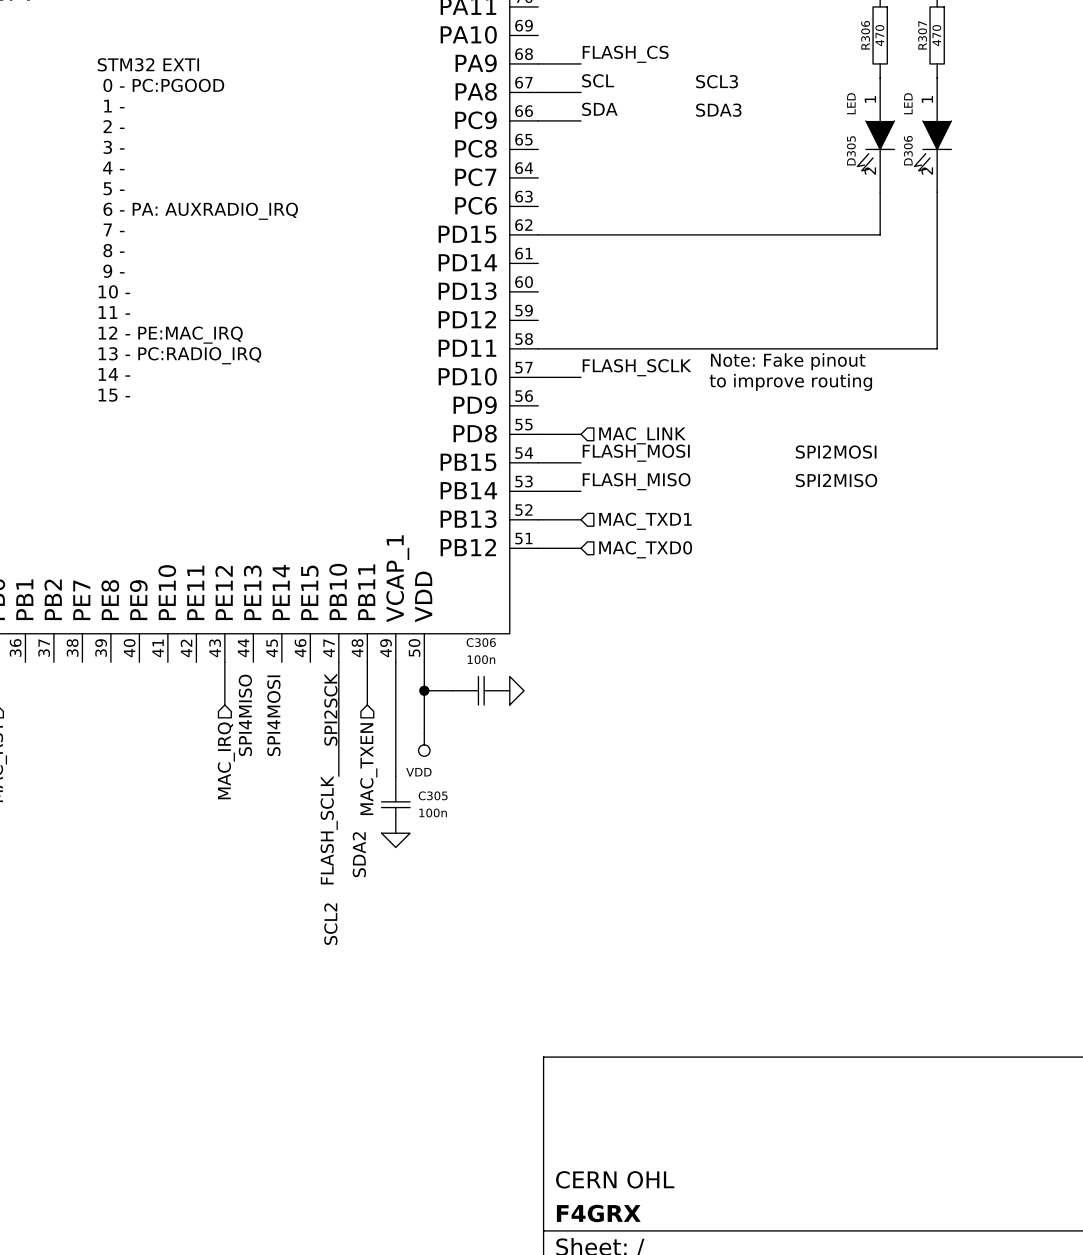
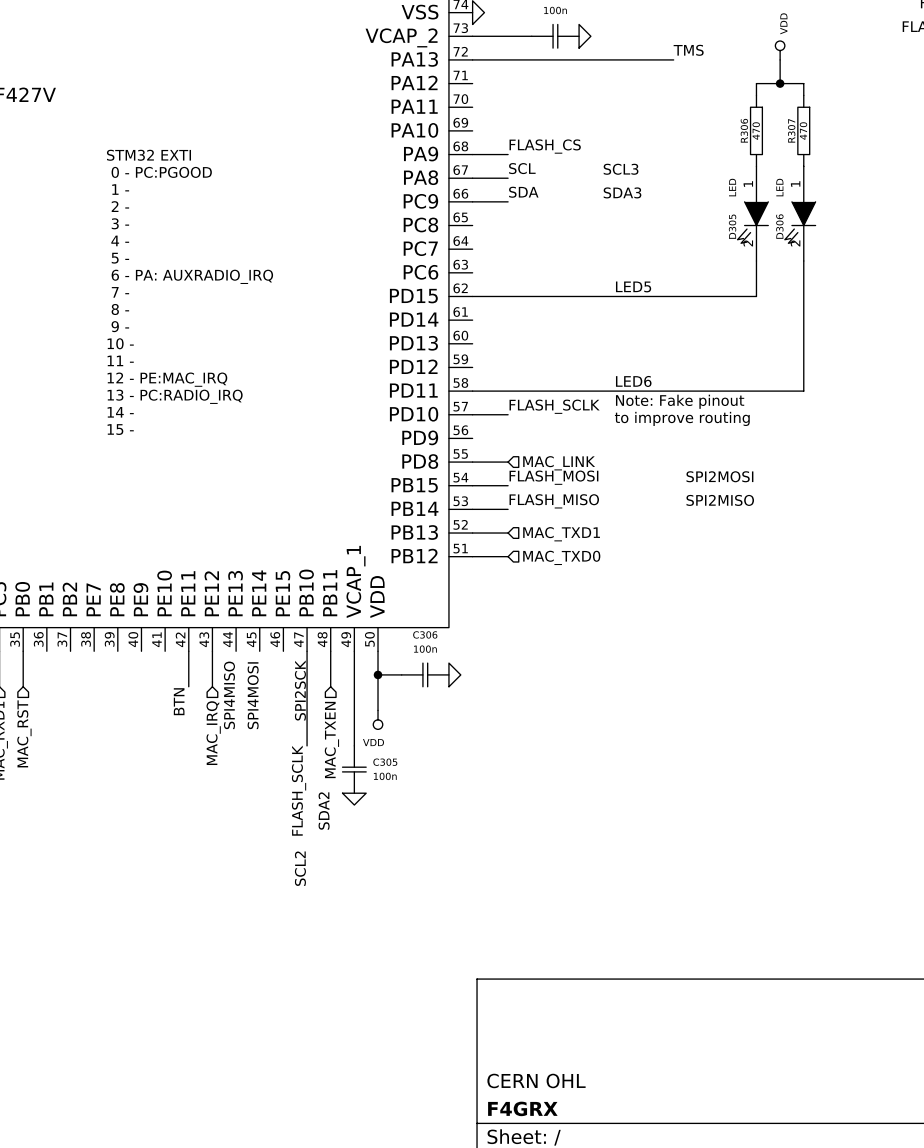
label: none -> LED5 (633, 286)
label: none -> LED6 (633, 381)
wire: none -> (188, 651) (188, 686)
label: none -> BTN (179, 701)

